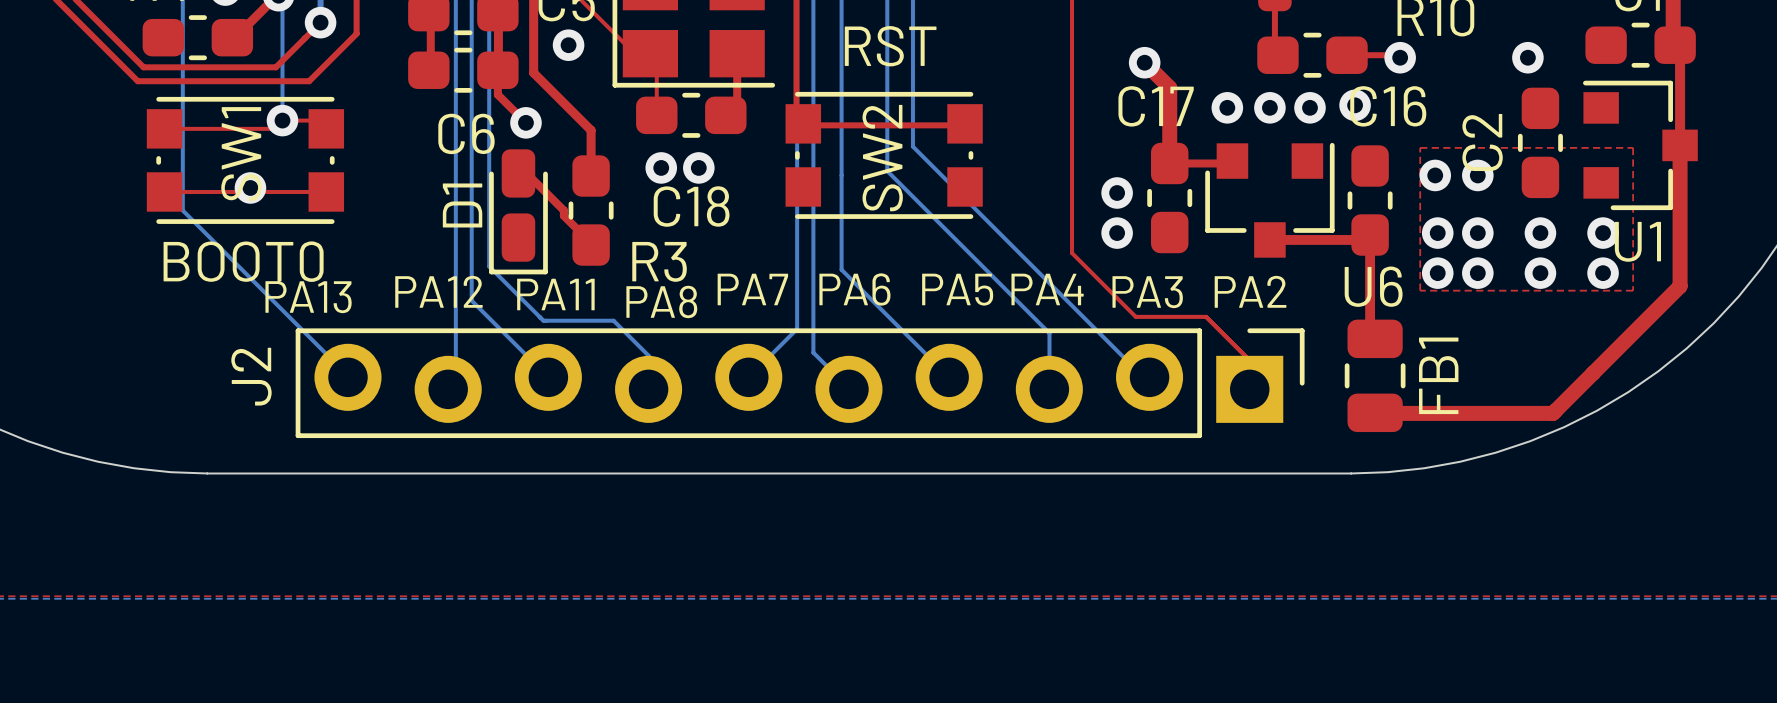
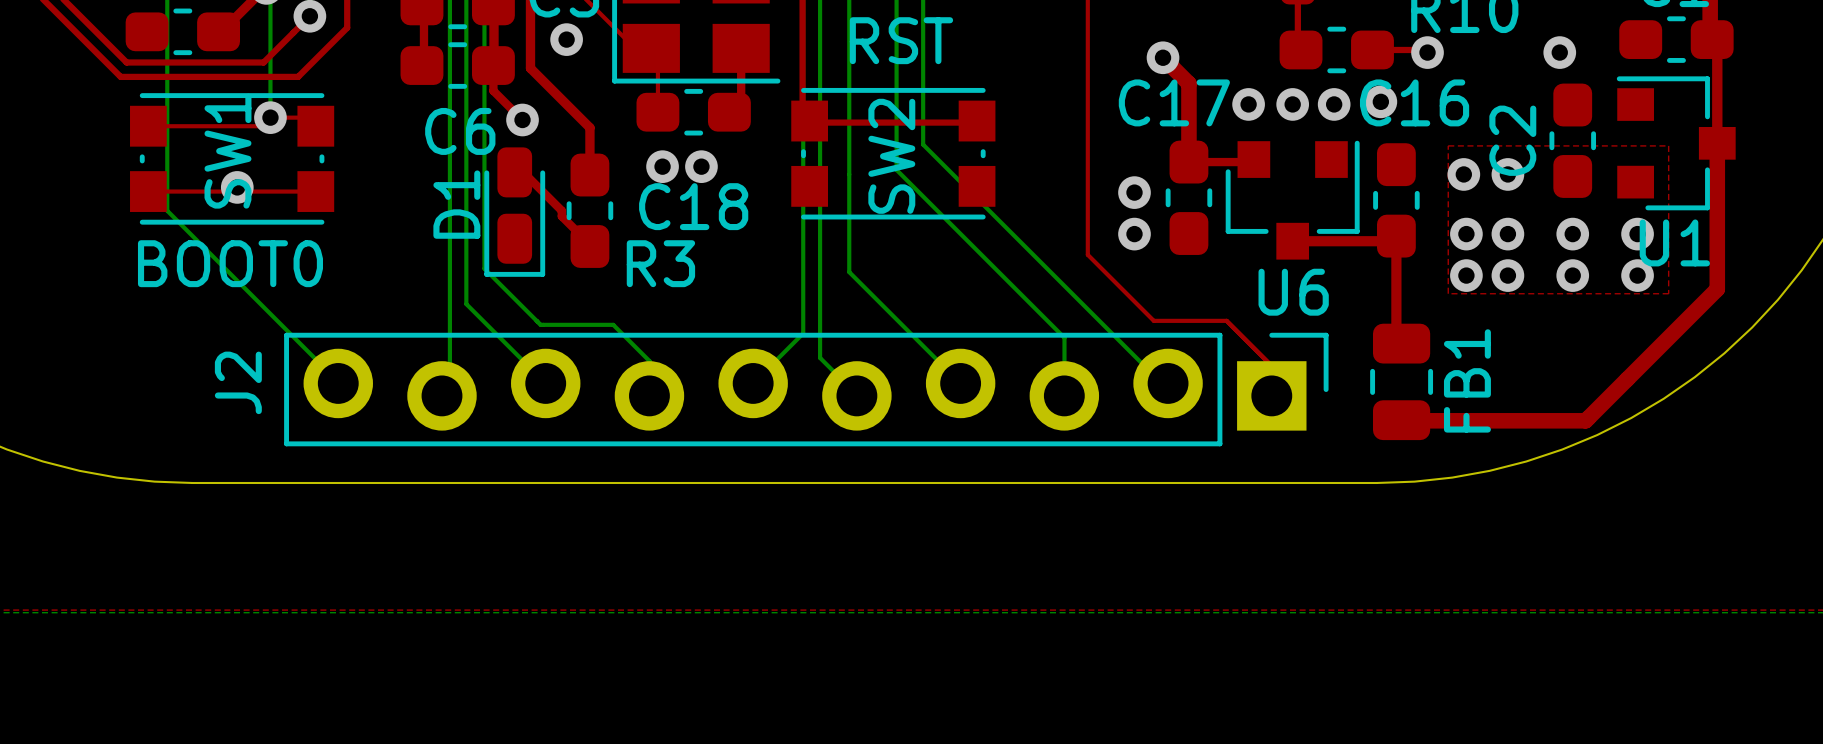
U6 name position: U6 (1373, 286) -> U6 (1293, 292)
text: PA7 (752, 289) -> none
text: PA6 (854, 289) -> none
text: PA5 (957, 289) -> none
text: PA4 (1047, 289) -> none
text: PA12 (438, 291) -> none
text: PA2 (1250, 291) -> none
text: PA3 (1147, 292) -> none
text: PA11 (555, 294) -> none
text: PA13 (308, 297) -> none
text: PA8 (661, 301) -> none

